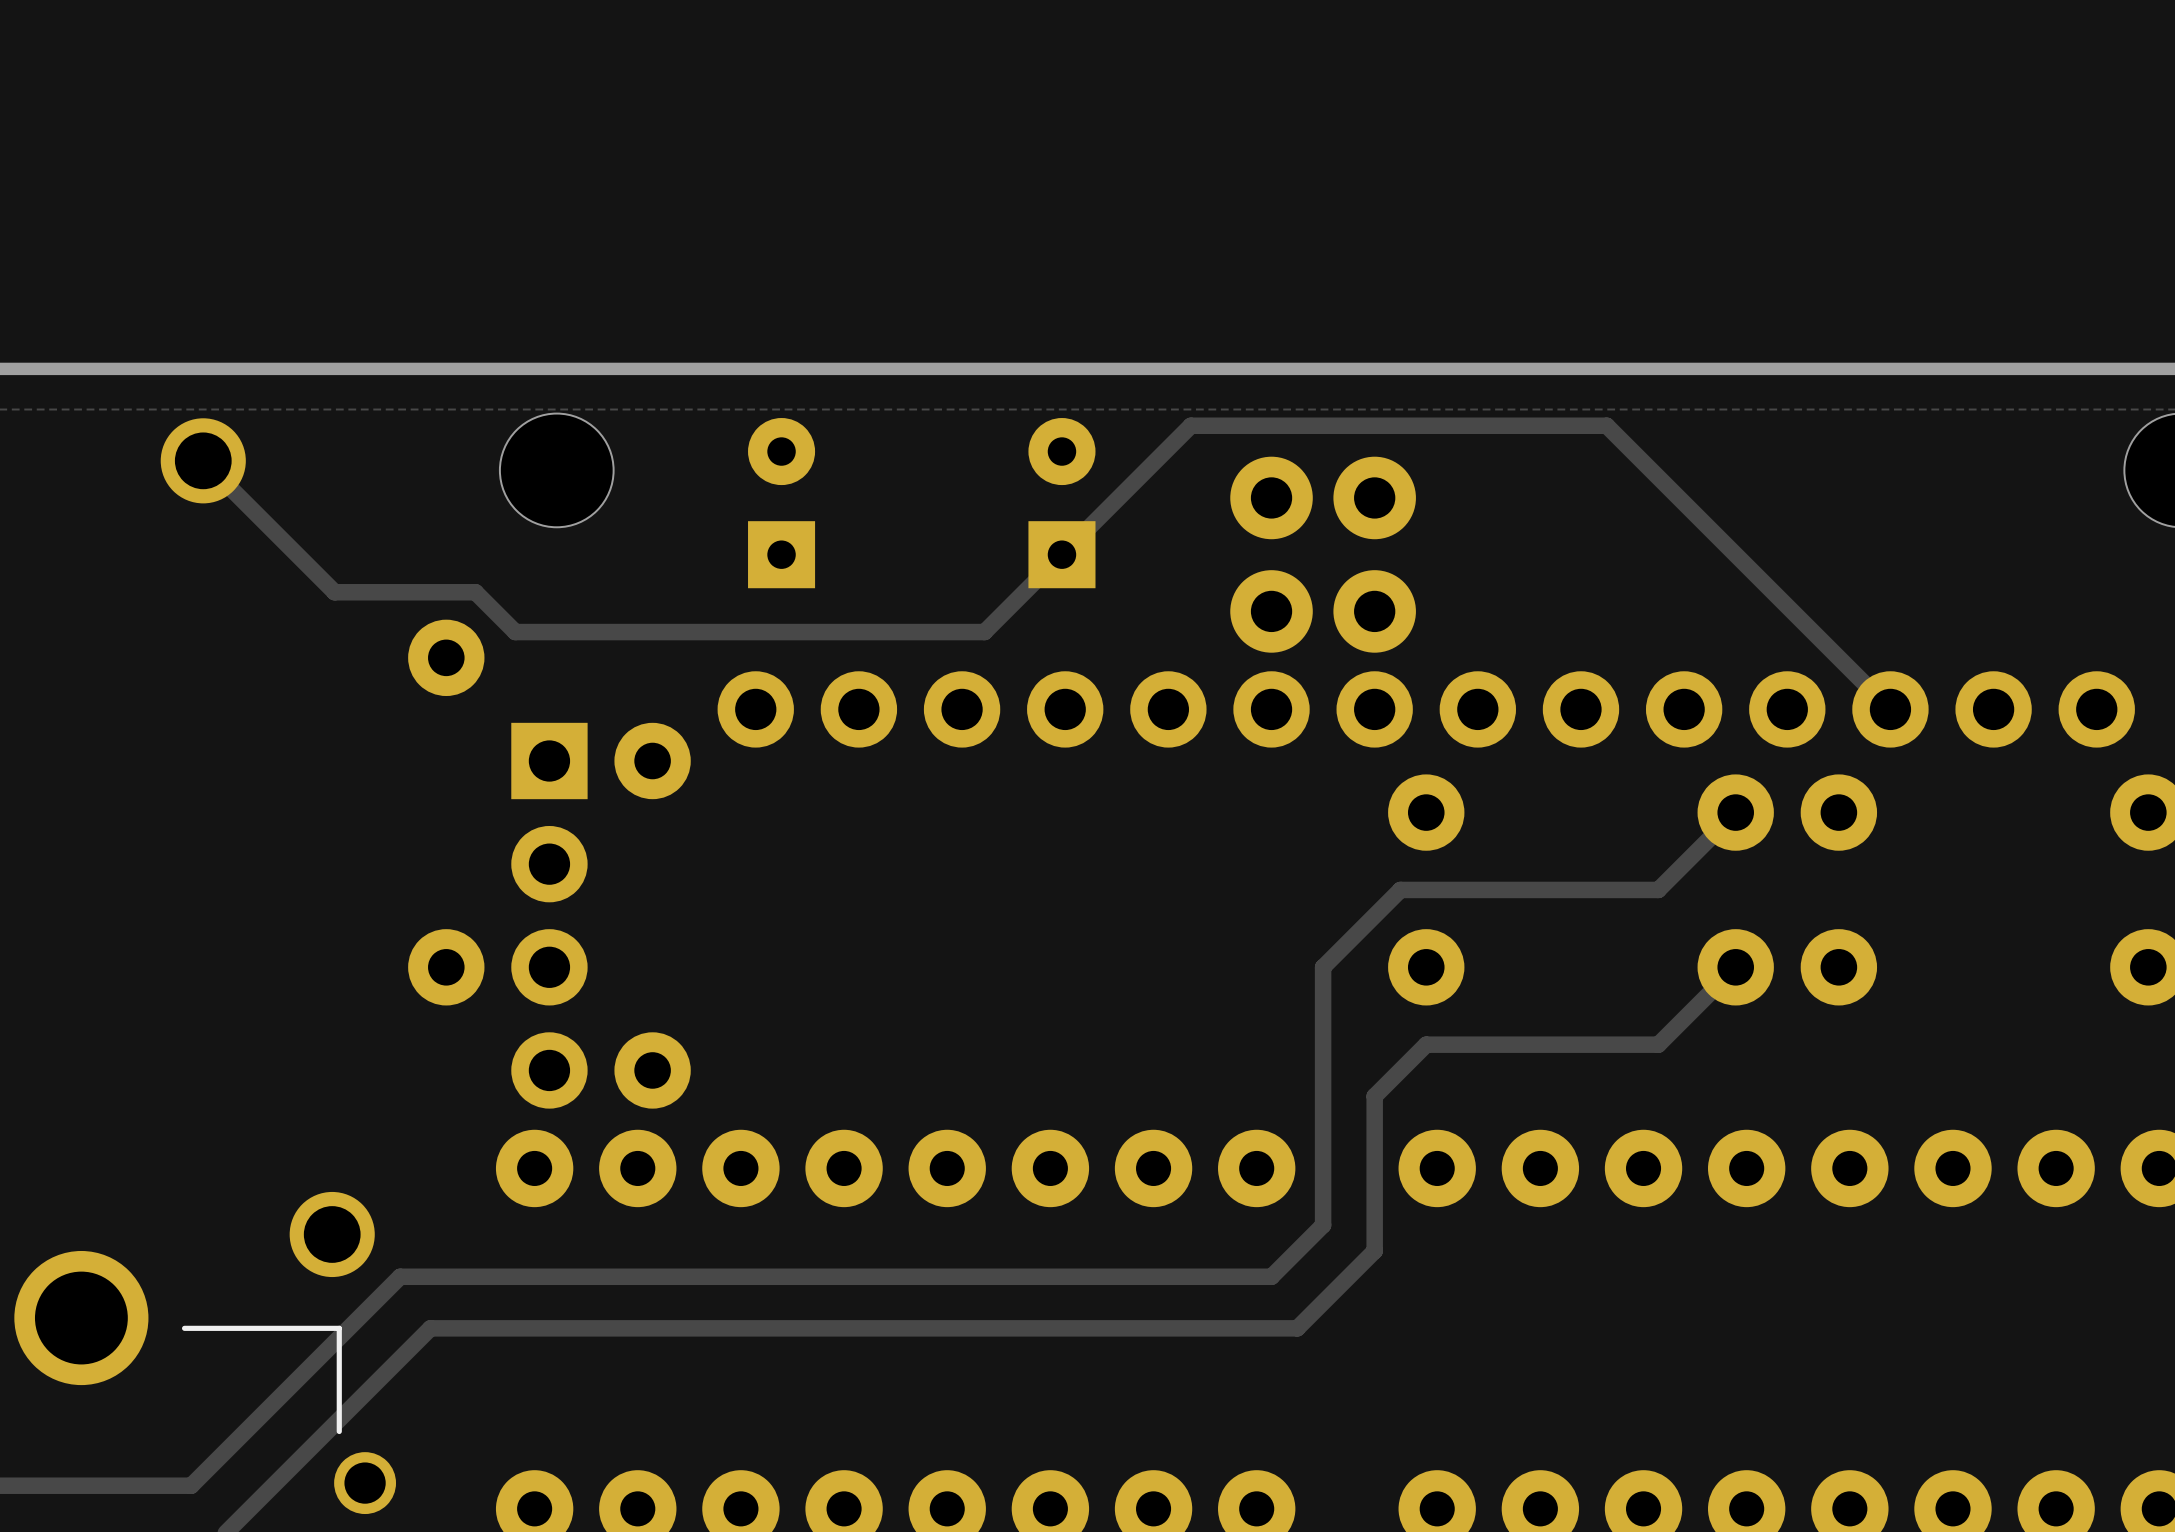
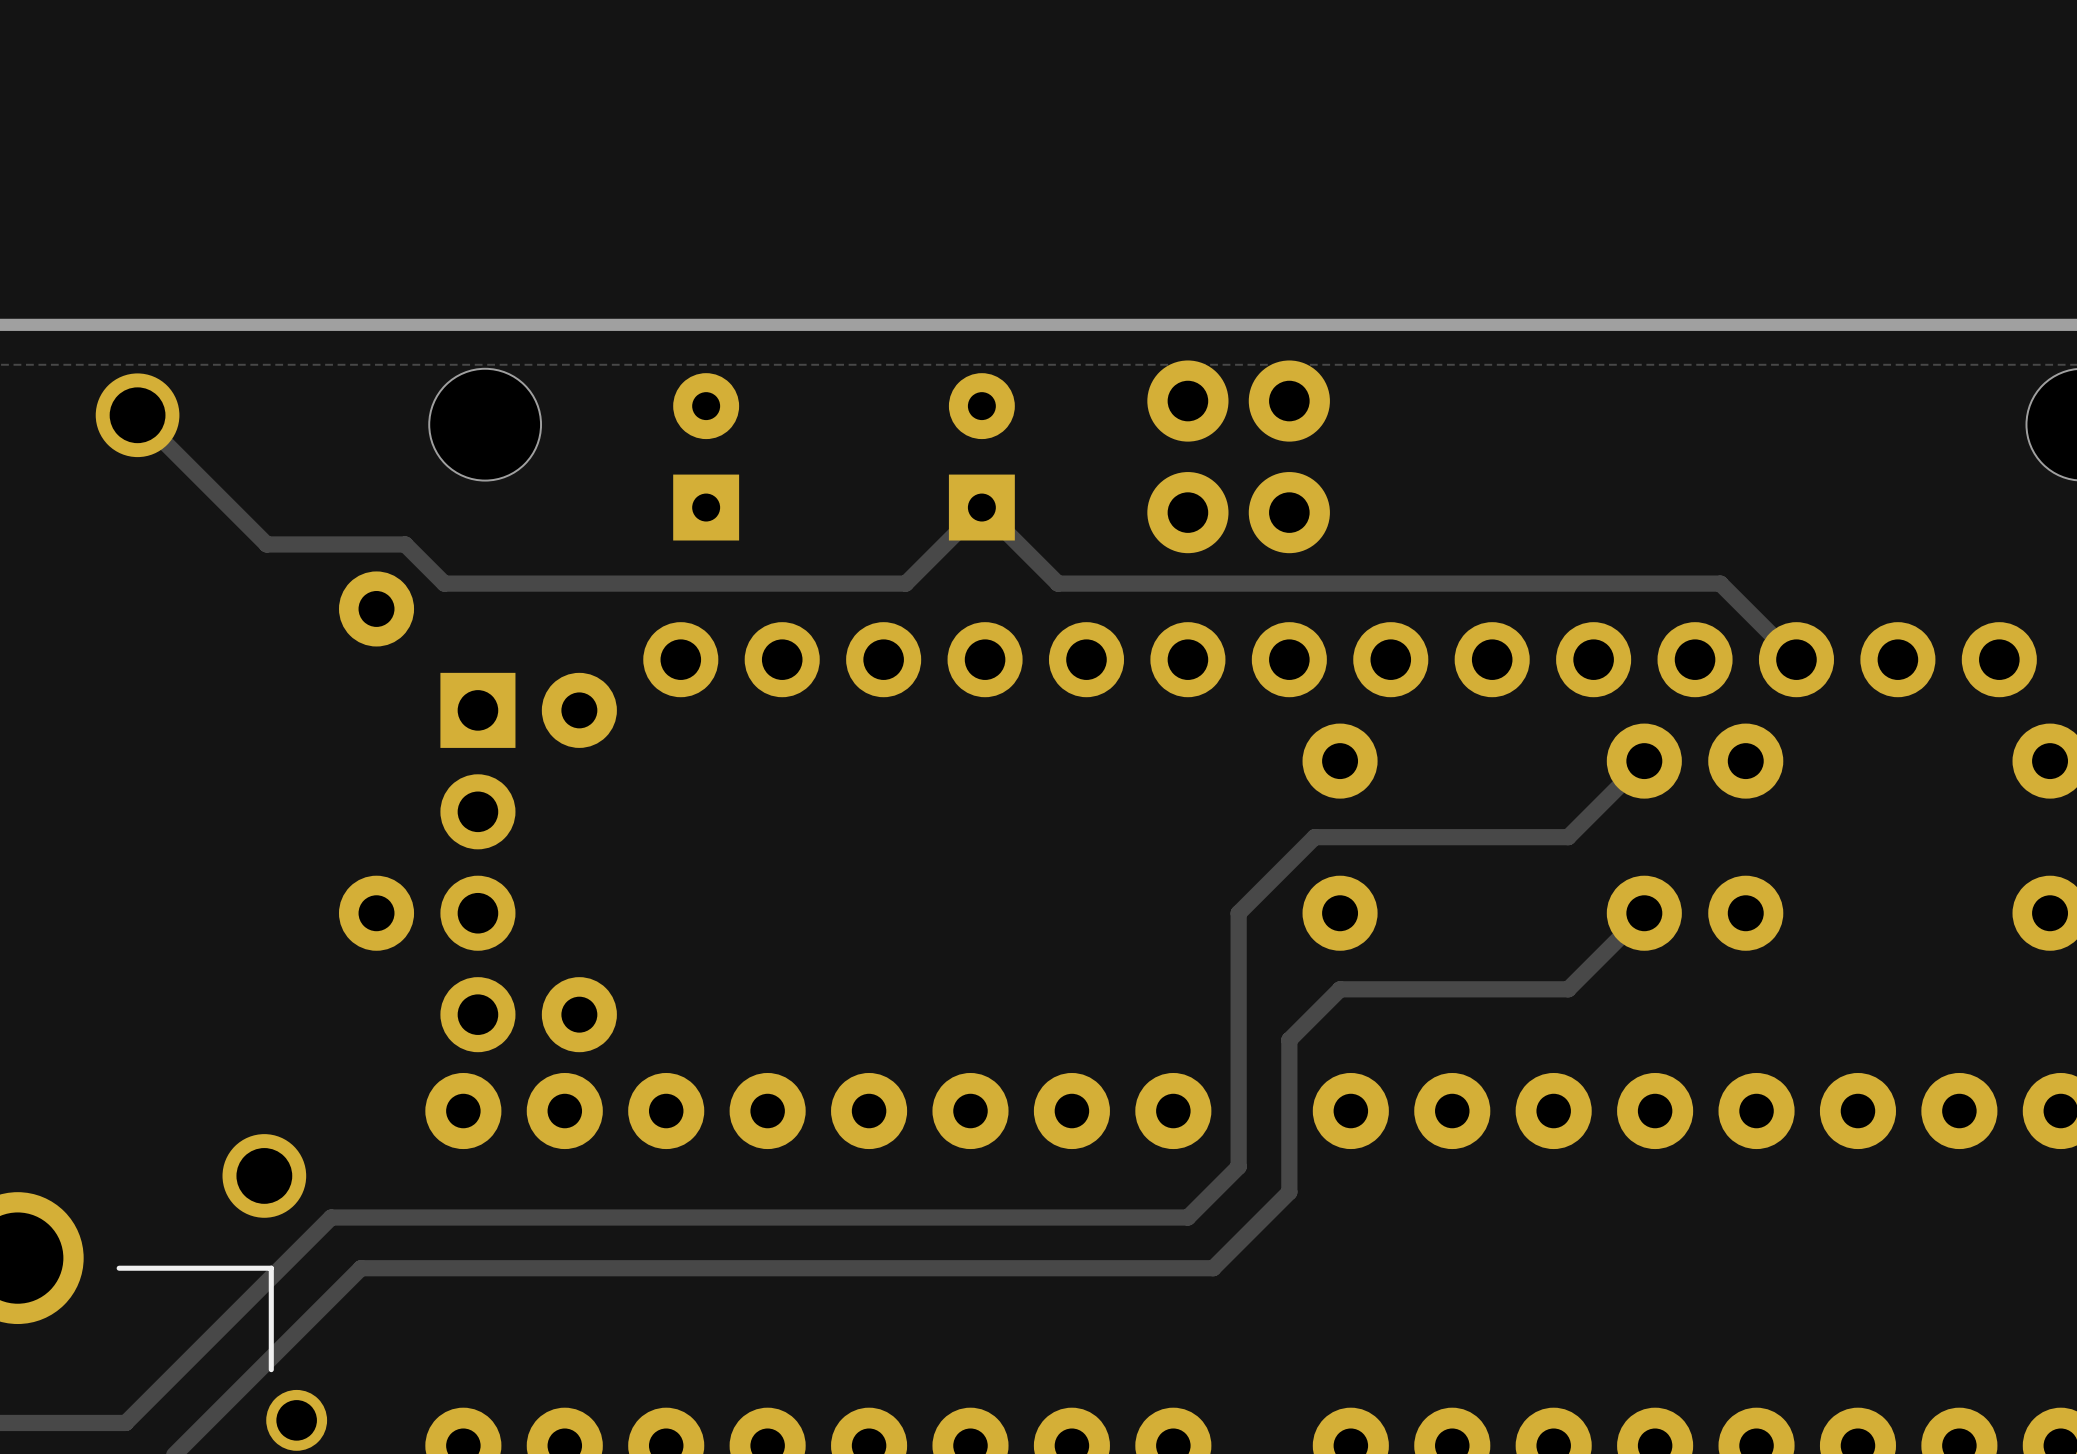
track: (1061, 554) (1190, 425) (1606, 425) (1813, 632) -> (981, 507) (1057, 583) (1720, 583)
part position: (1271, 554) -> (1187, 456)
part position: (1374, 554) -> (1289, 456)

